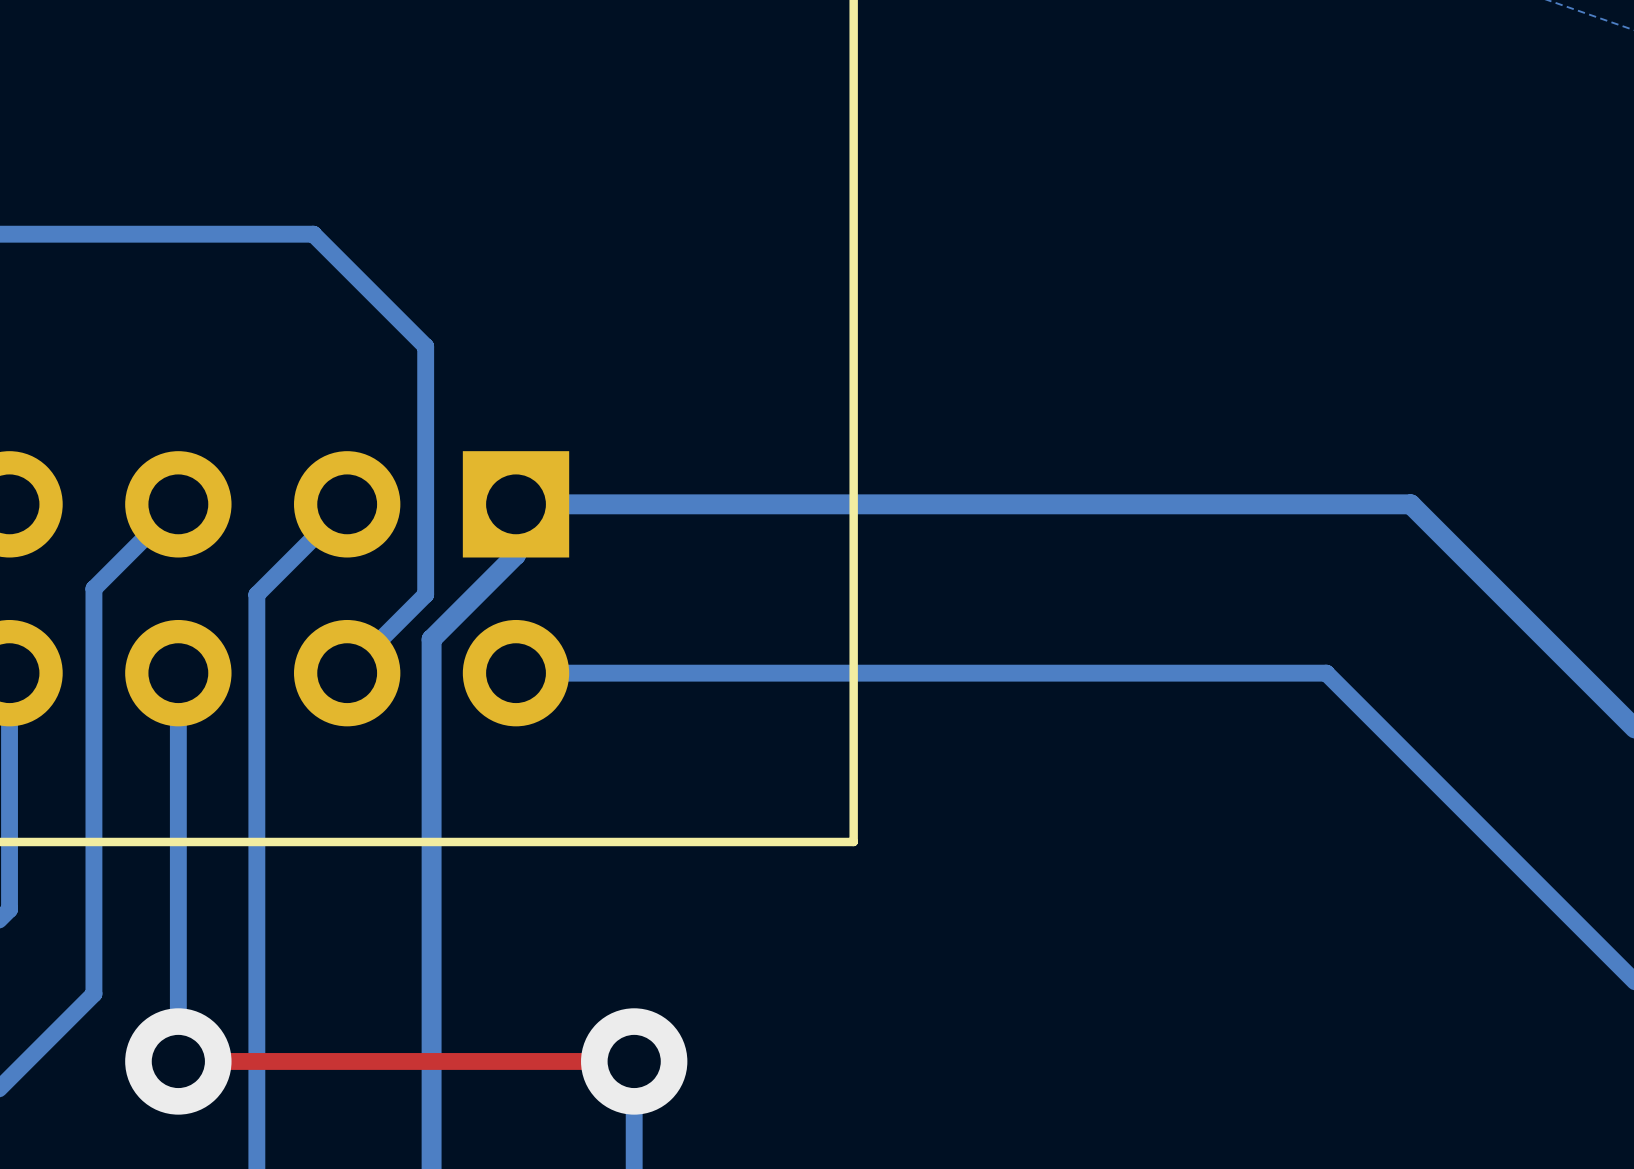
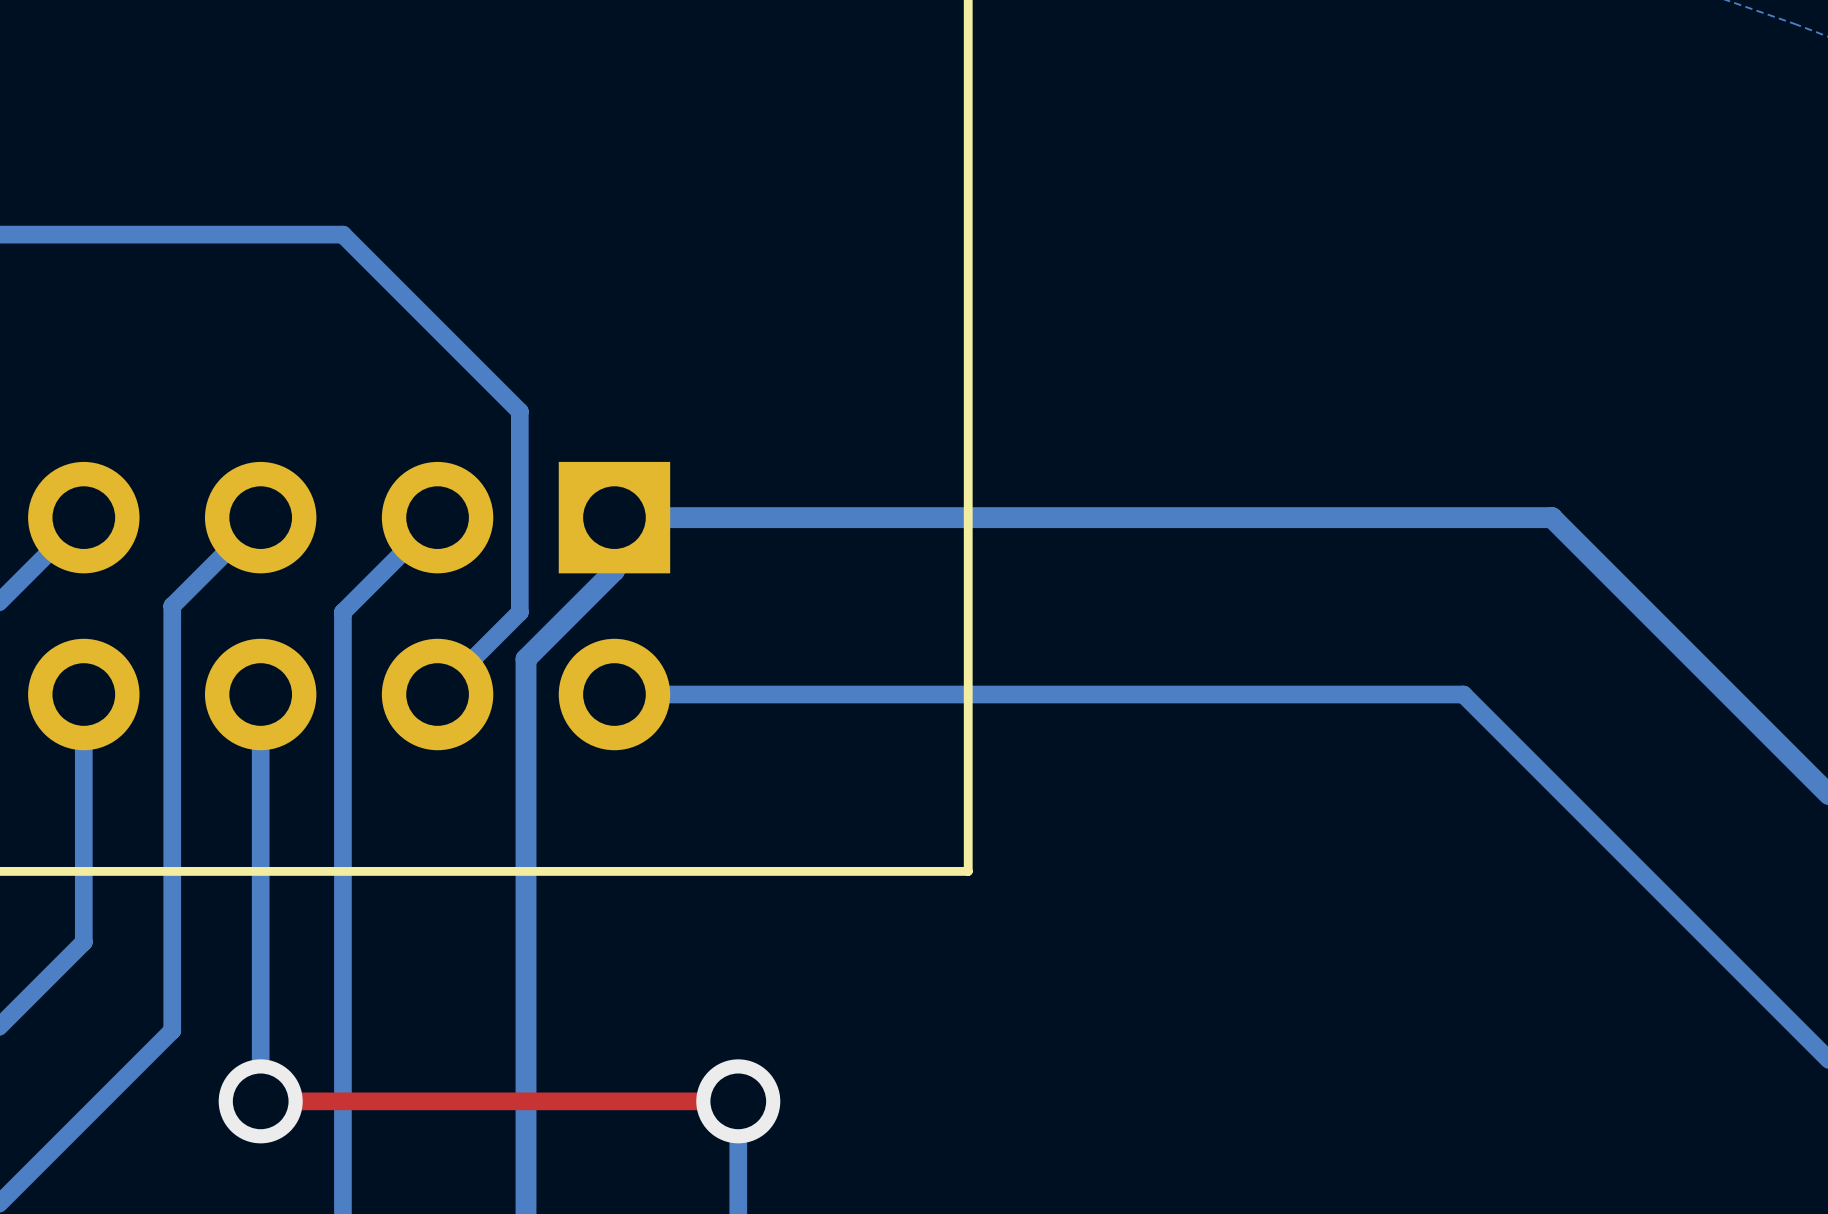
bottom track: (256, 234) (313, 234) (425, 346) (425, 403) -> (342, 234) (519, 411)
via size: [125, 1008, 232, 1115] -> [218, 1059, 303, 1144]
via size: [581, 1008, 688, 1115] -> [696, 1059, 781, 1144]

